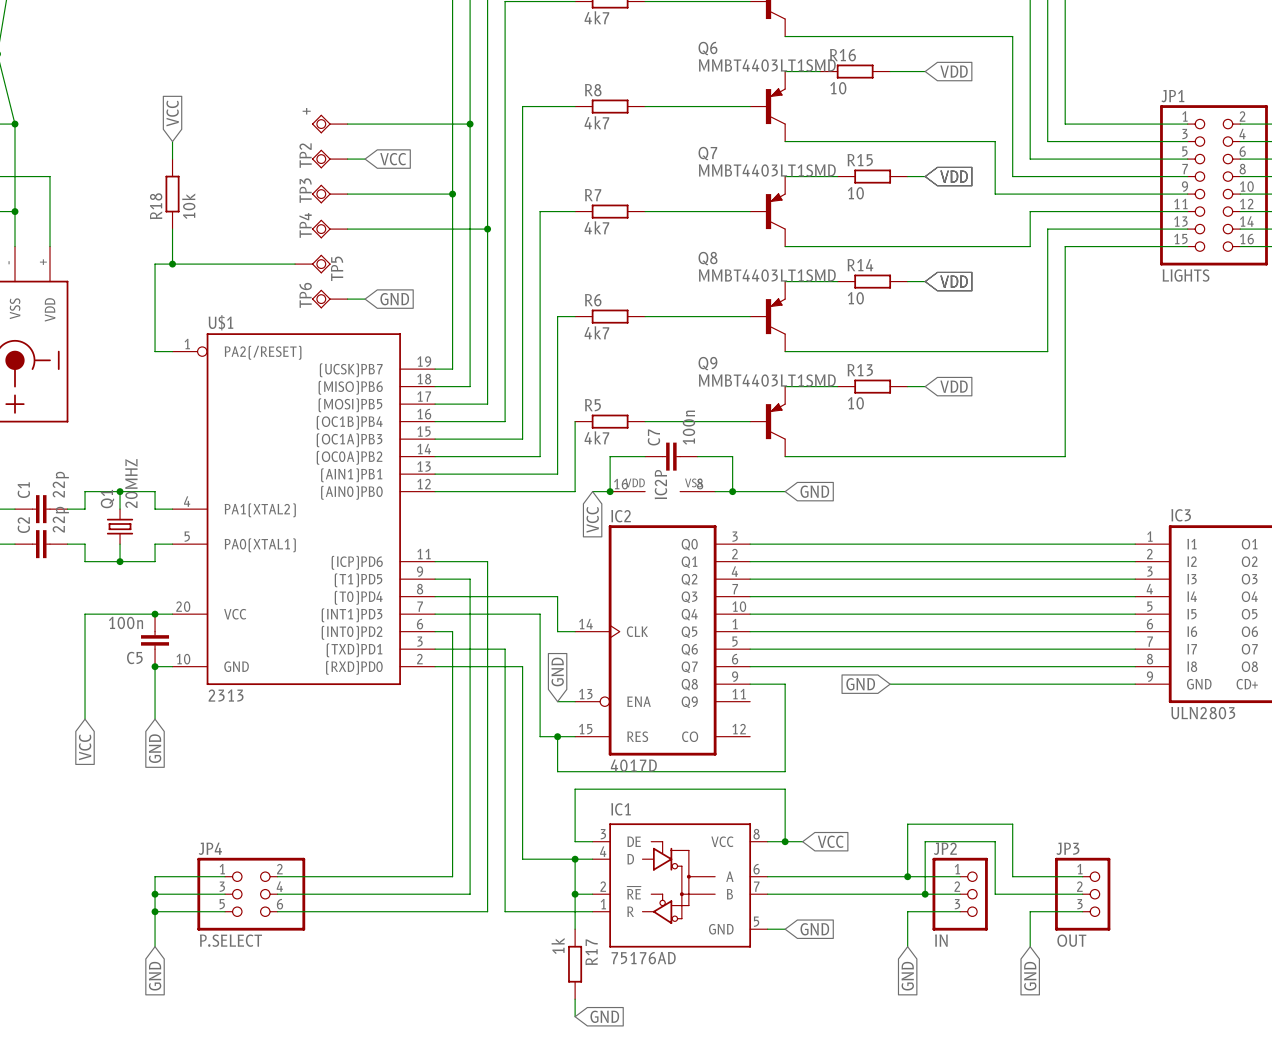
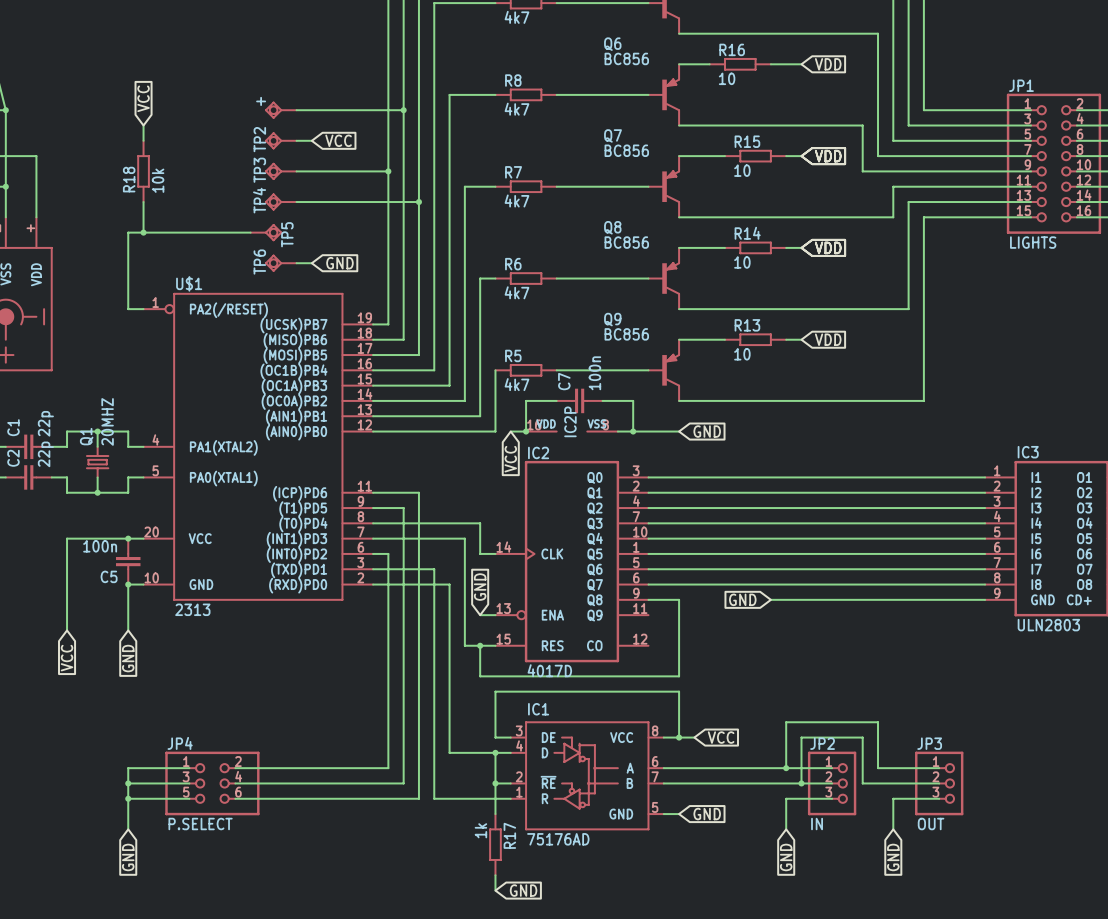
Q6 value: MMBT4403LT1SMD (767, 65) -> BC856 (626, 58)
Q7 value: MMBT4403LT1SMD (767, 170) -> BC856 (626, 150)
Q8 value: MMBT4403LT1SMD (767, 275) -> BC856 (626, 242)
Q9 value: MMBT4403LT1SMD (767, 380) -> BC856 (626, 334)

